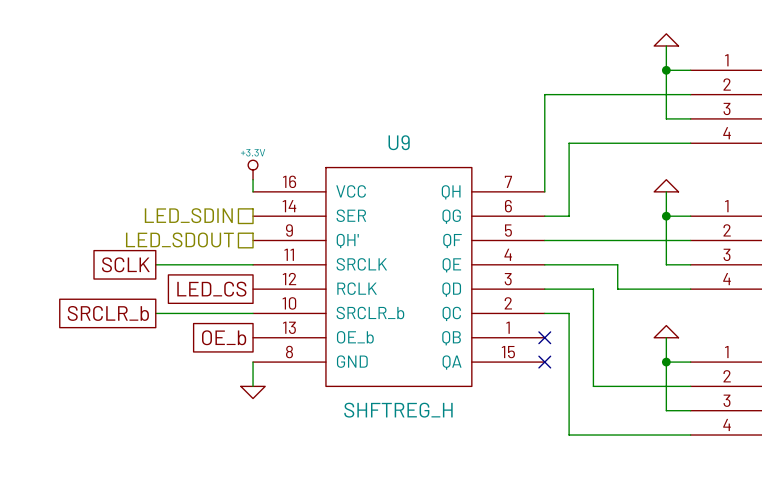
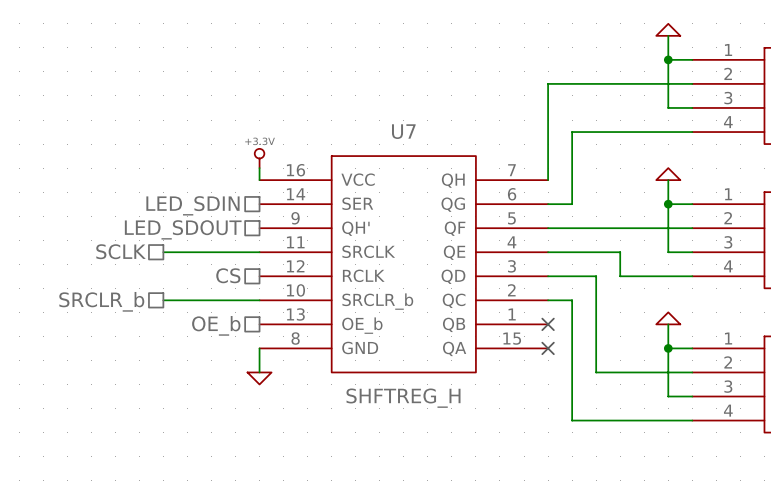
U9 name: U9 (399, 142) -> U7 (403, 131)
hierarchical label: none -> SCLK (121, 251)
global label: SCLK (125, 264) -> none
hierarchical label: none -> CS (228, 275)
global label: LED_CS (211, 289) -> none
hierarchical label: none -> SRCLR_b (101, 301)
global label: SRCLR_b (108, 313) -> none
hierarchical label: none -> OE_b (216, 325)
global label: OE_b (224, 337) -> none

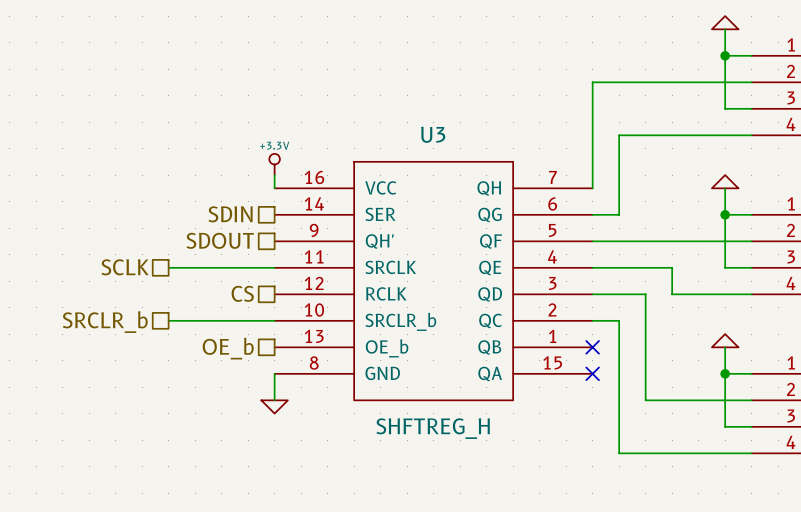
U7 name: U7 (403, 131) -> U3 (433, 134)
hierarchical label: LED_SDIN (192, 205) -> SDIN (230, 214)
hierarchical label: LED_SDOUT (183, 229) -> SDOUT (220, 240)

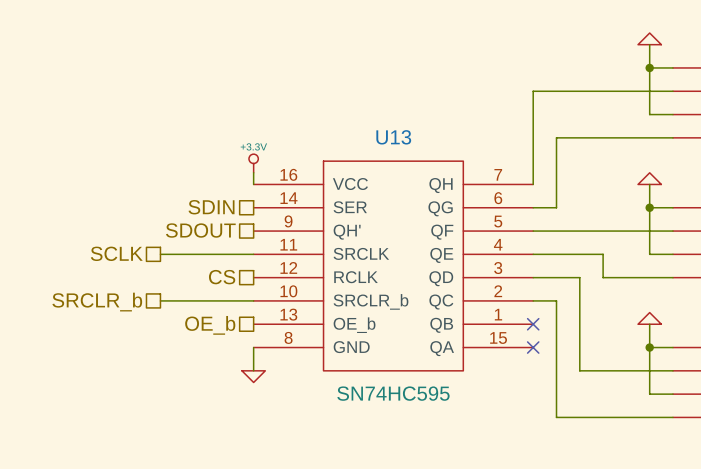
U3 name: U3 (433, 134) -> U13 (393, 137)
U3 value: SHFTREG_H (433, 428) -> SN74HC595 (393, 393)

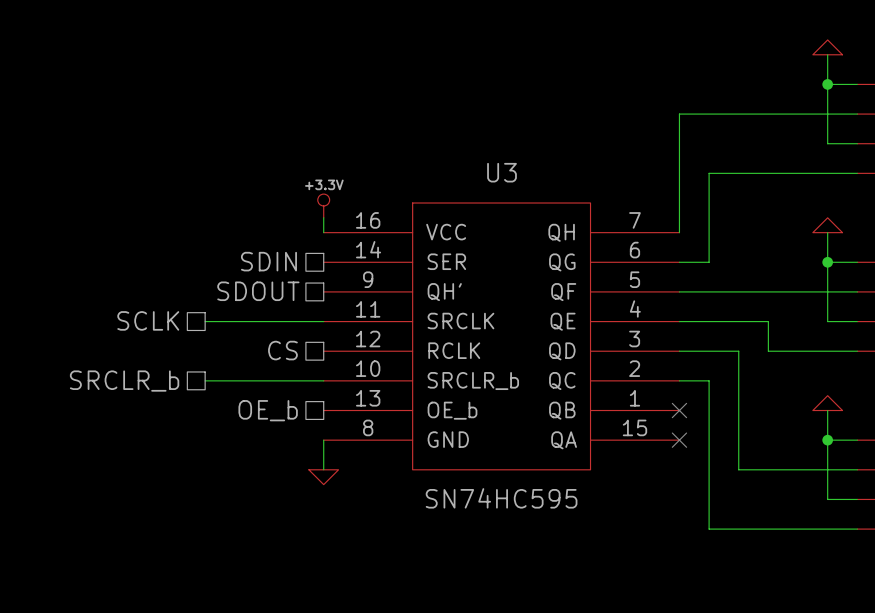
U13 name: U13 (393, 137) -> U3 (502, 172)

